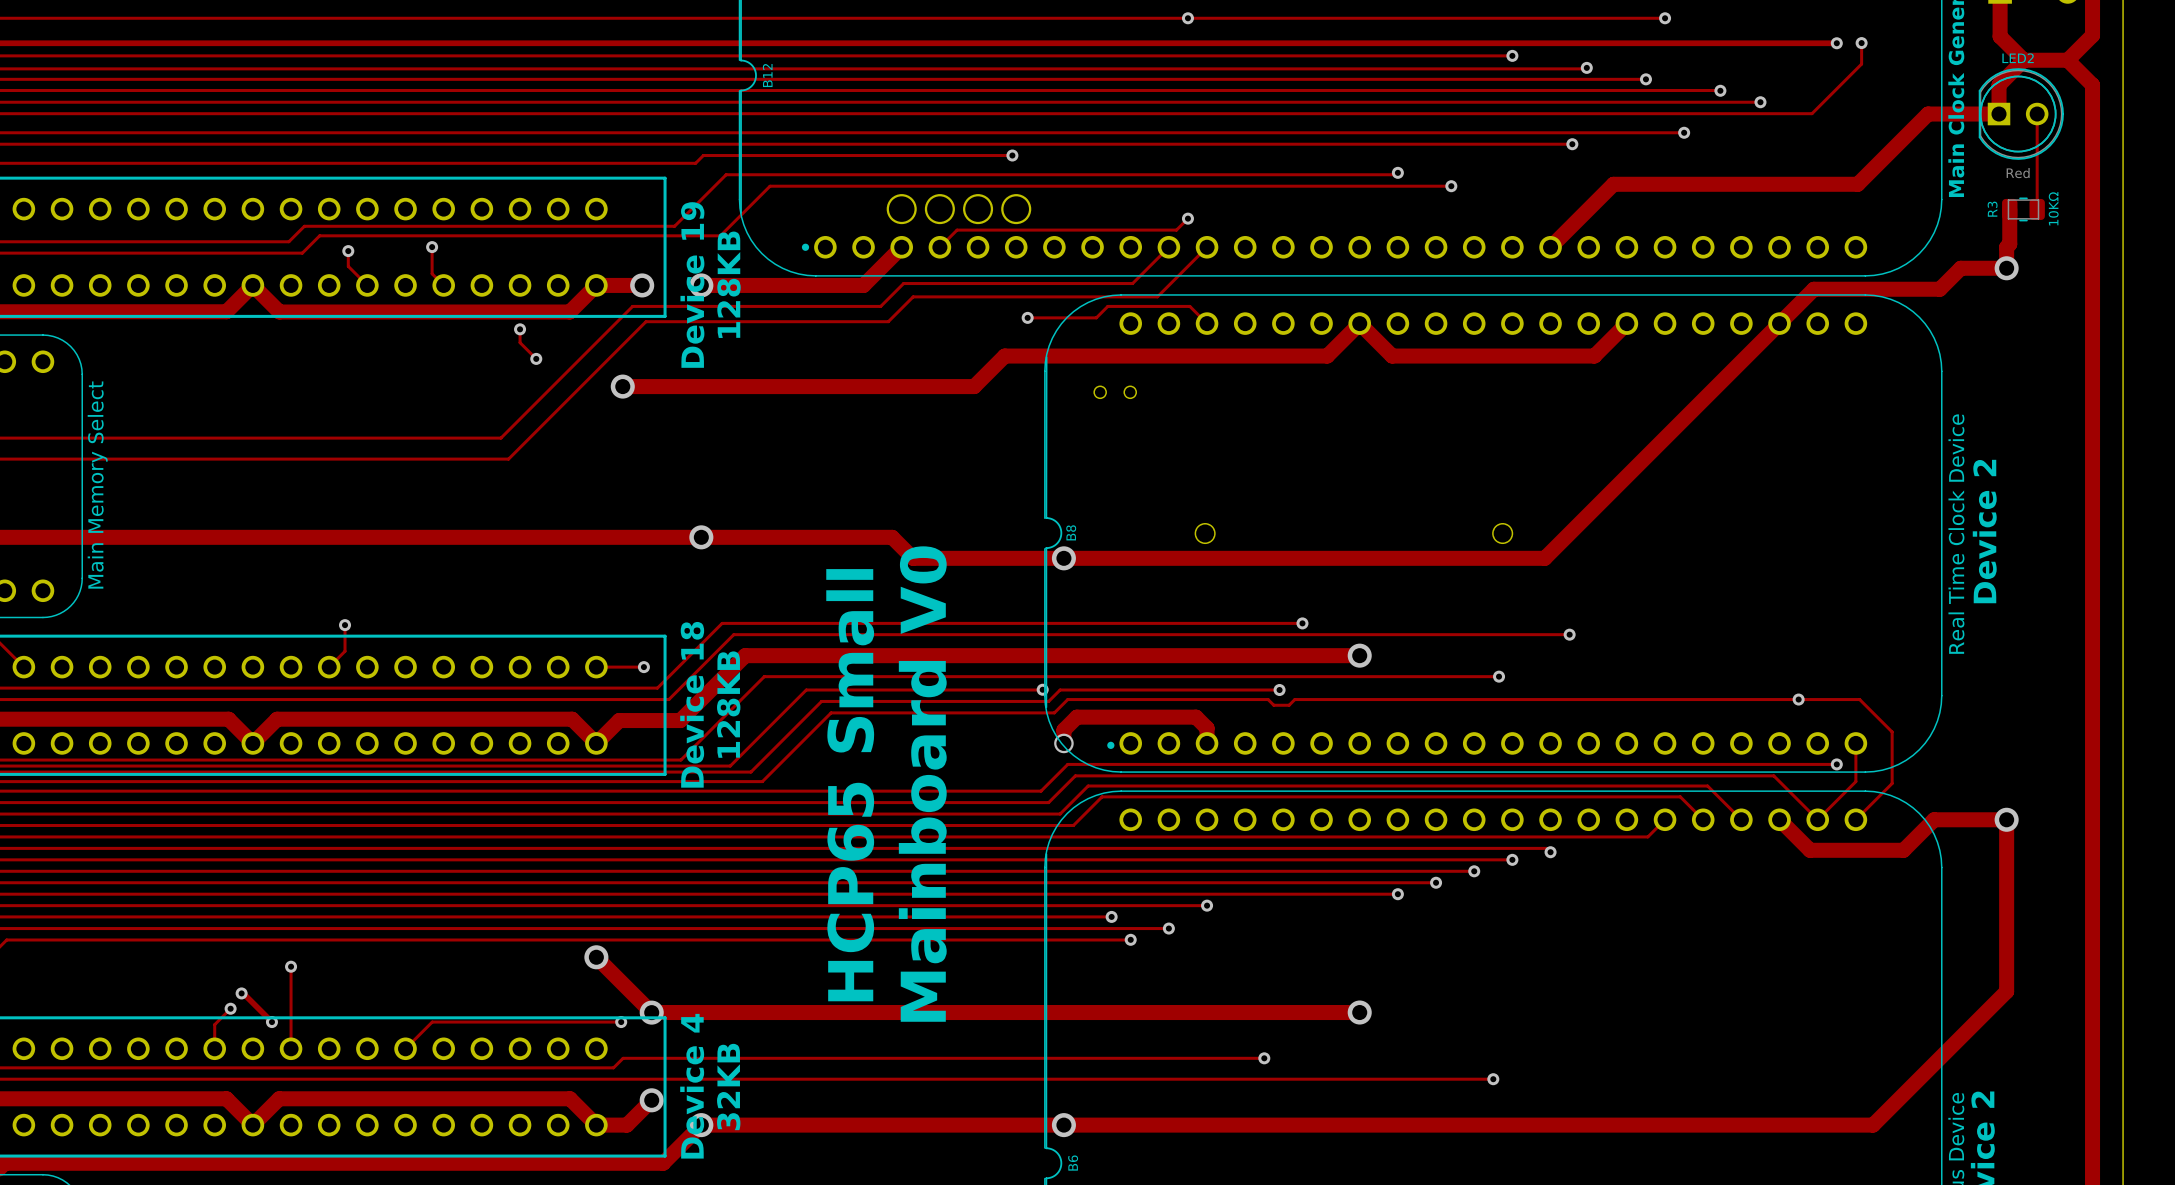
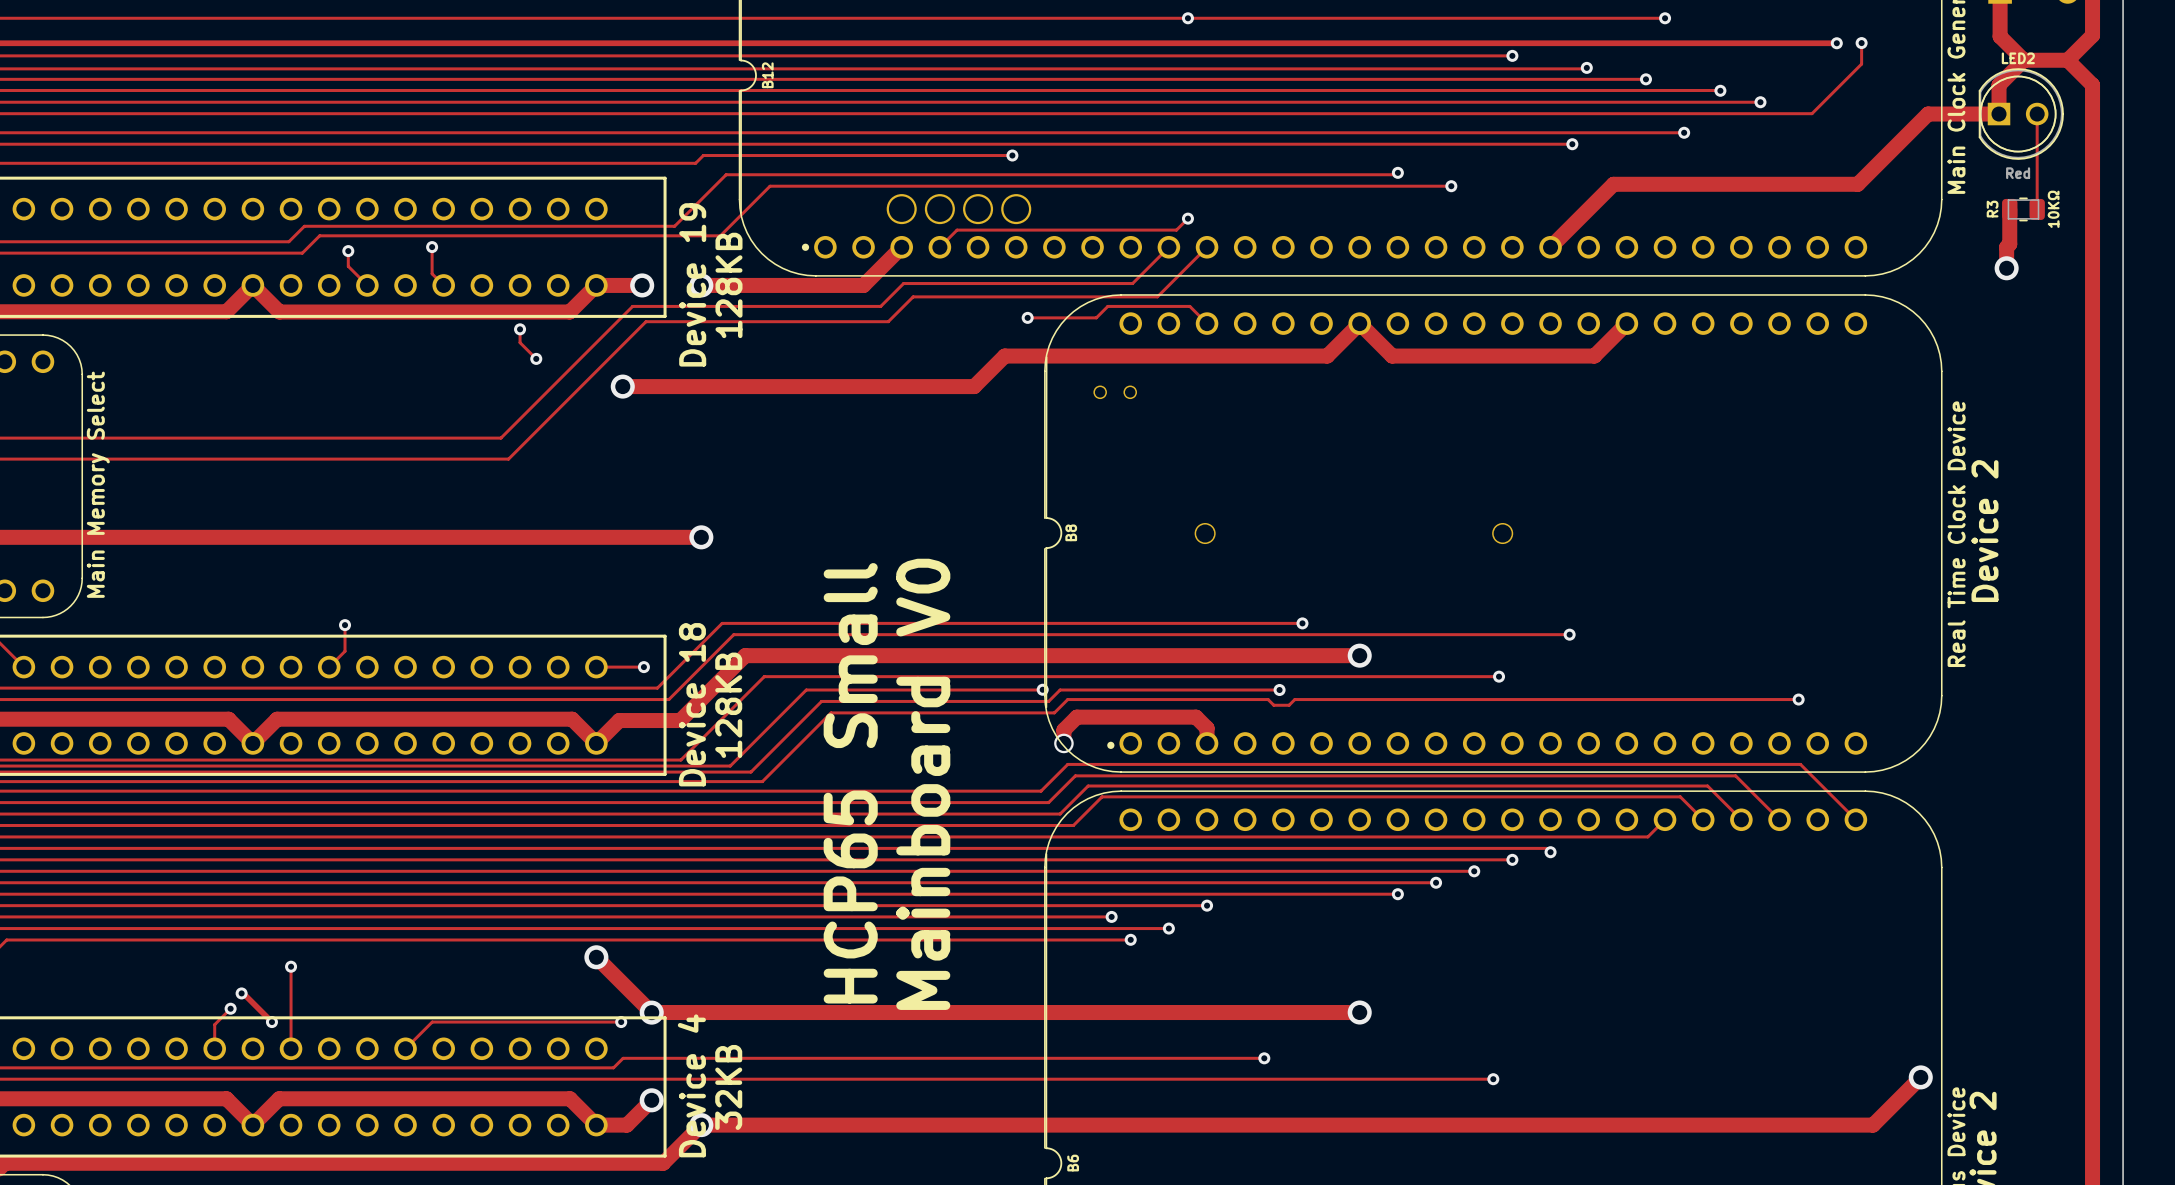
track: (2006, 268) (1960, 268) (1939, 289) (1813, 289) (1544, 558) (913, 558) (892, 537) (701, 537) -> none
via: (1063, 558) -> none
track: (1798, 699) (1859, 699) (1892, 731) (1892, 783) (1855, 819) -> none
track: (1855, 743) (1855, 781) (1817, 819) (1773, 775) (1735, 775) -> (1779, 819) (1735, 775)
track: (1800, 764) (1836, 764) -> (1800, 764) (1855, 819)
via: (1836, 764) -> none
track: (1779, 819) (1810, 850) (1903, 850) (1934, 819) (2006, 819) (2006, 991) (1920, 1077) -> none
via: (2006, 819) -> none
via: none -> (1920, 1077)
via: (1063, 1125) -> none

